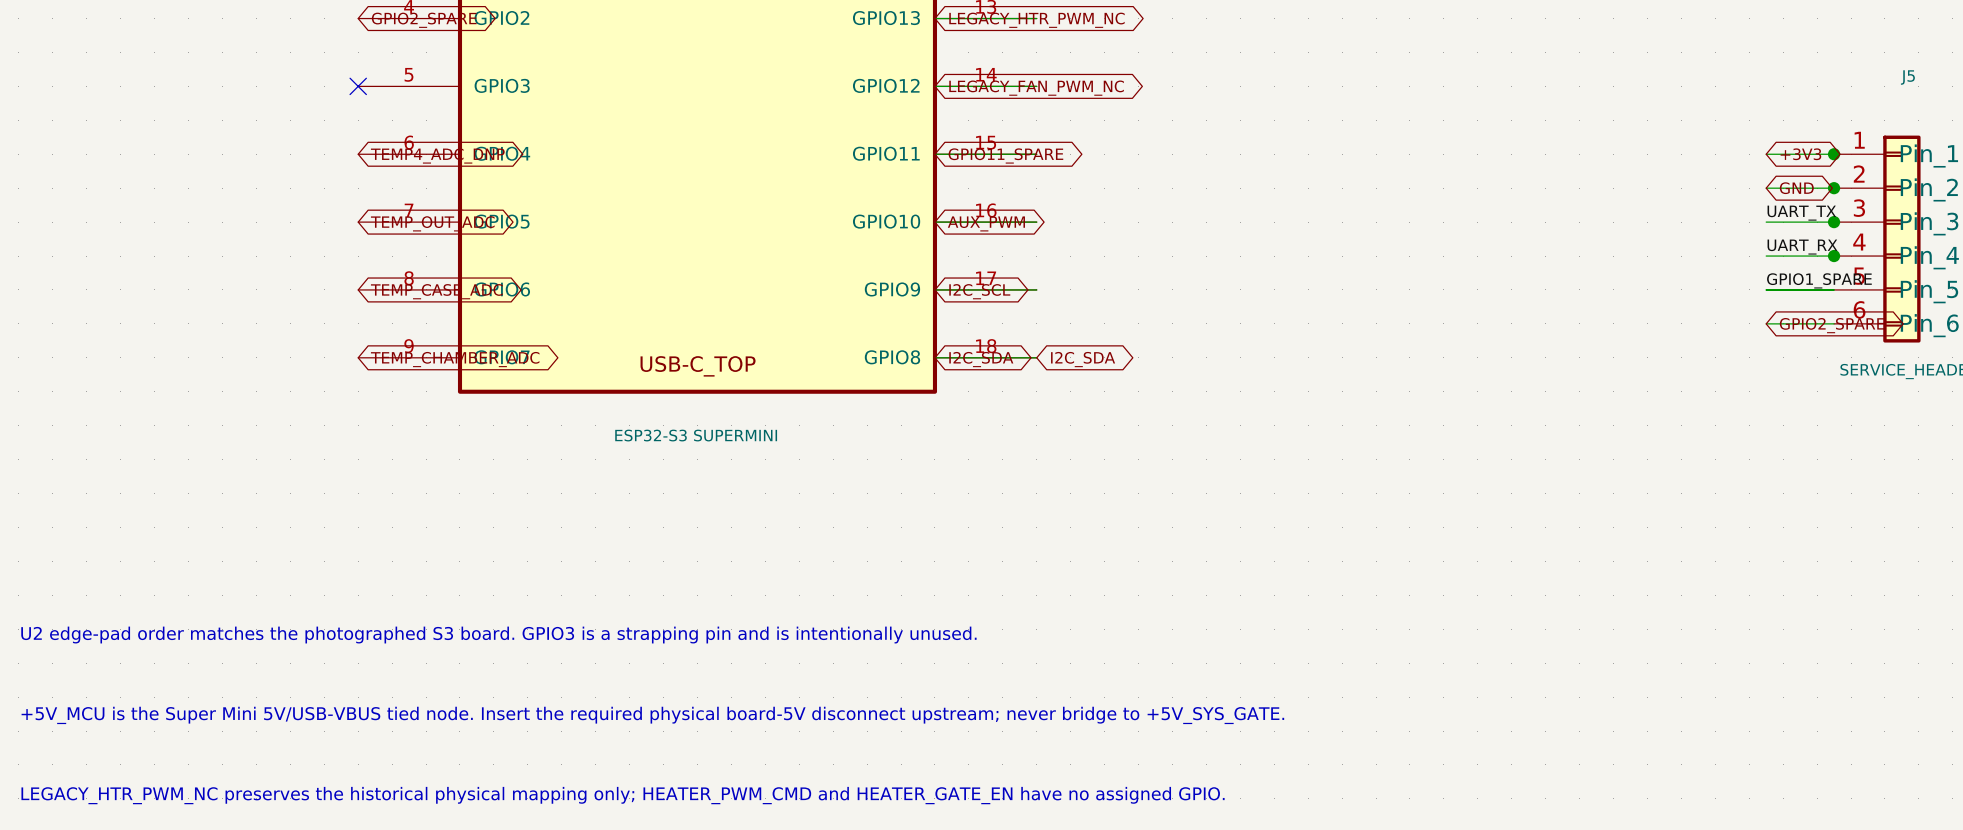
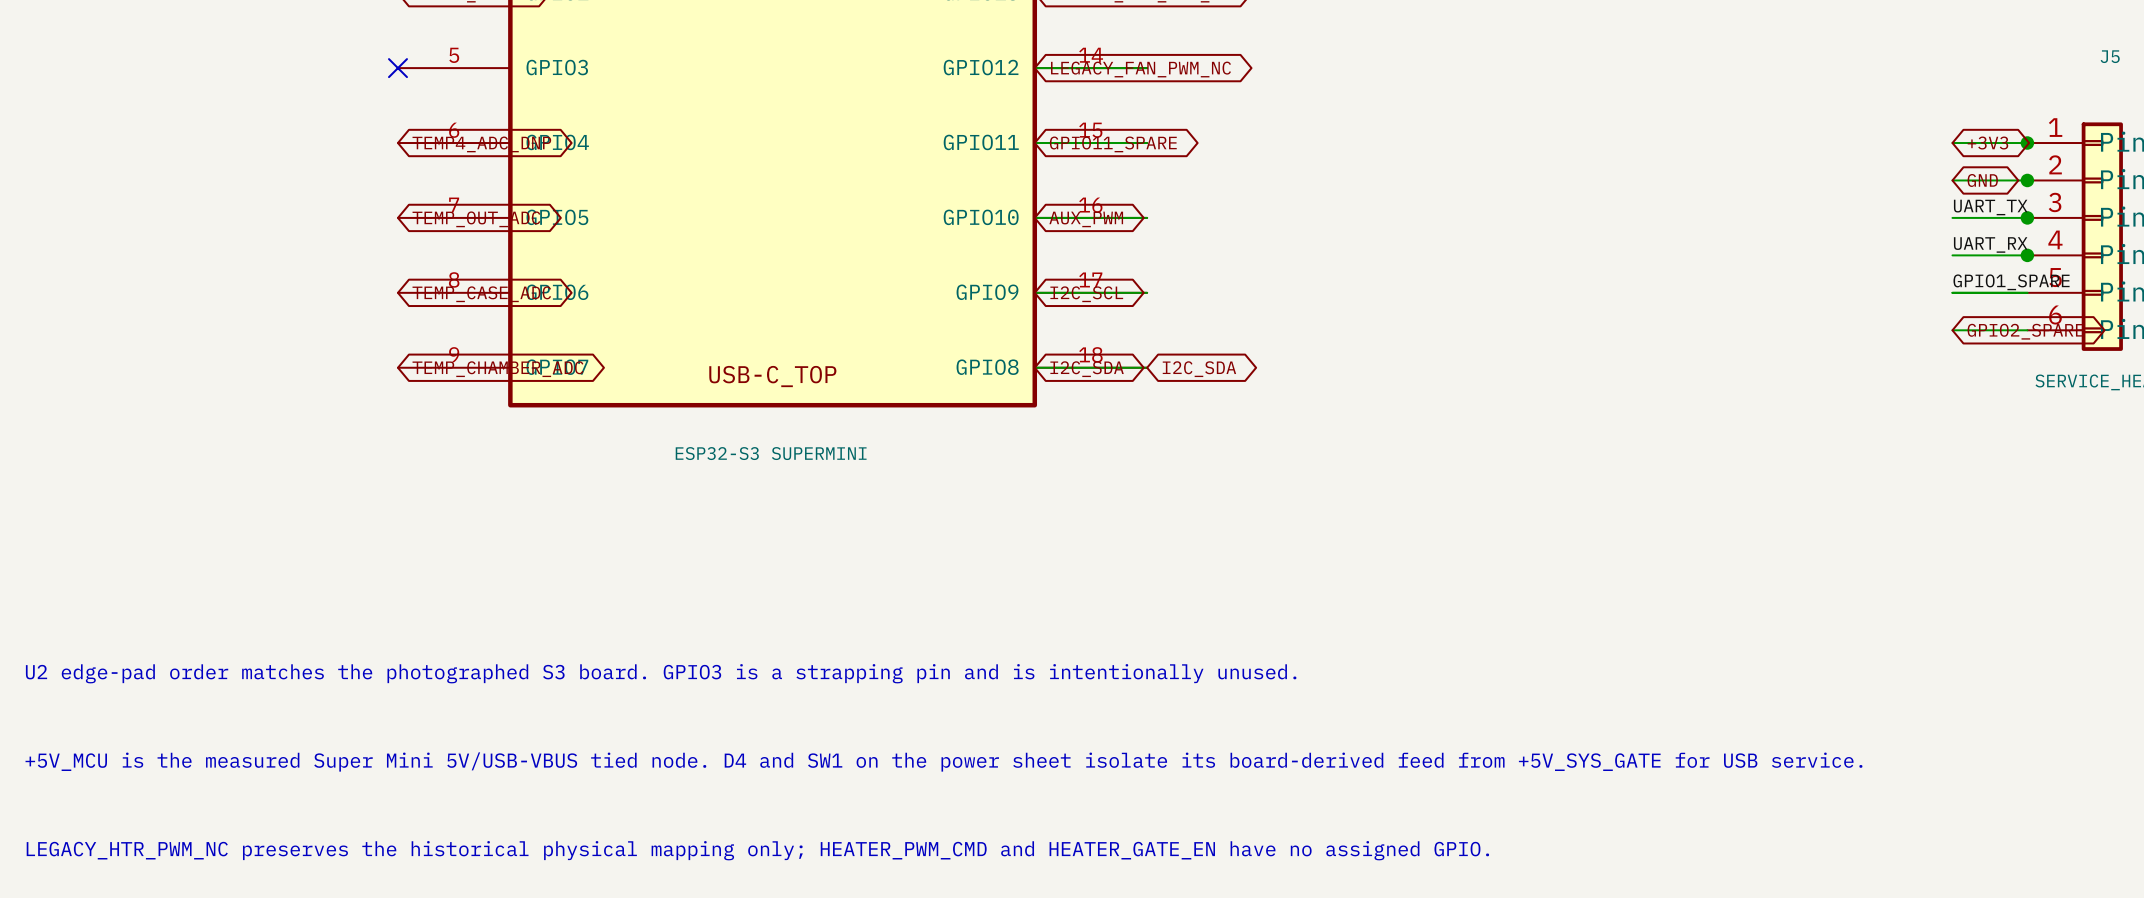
text: +5V_MCU is the Super Mini 5V/USB-VBUS tied node. Insert the required physical board-5V disconnect upstream; never bridge to +5V_SYS_GATE. (652, 715) -> +5V_MCU is the measured Super Mini 5V/USB-VBUS tied node. D4 and SW1 on the power sheet isolate its board-derived feed from +5V_SYS_GATE for USB service. (943, 761)

